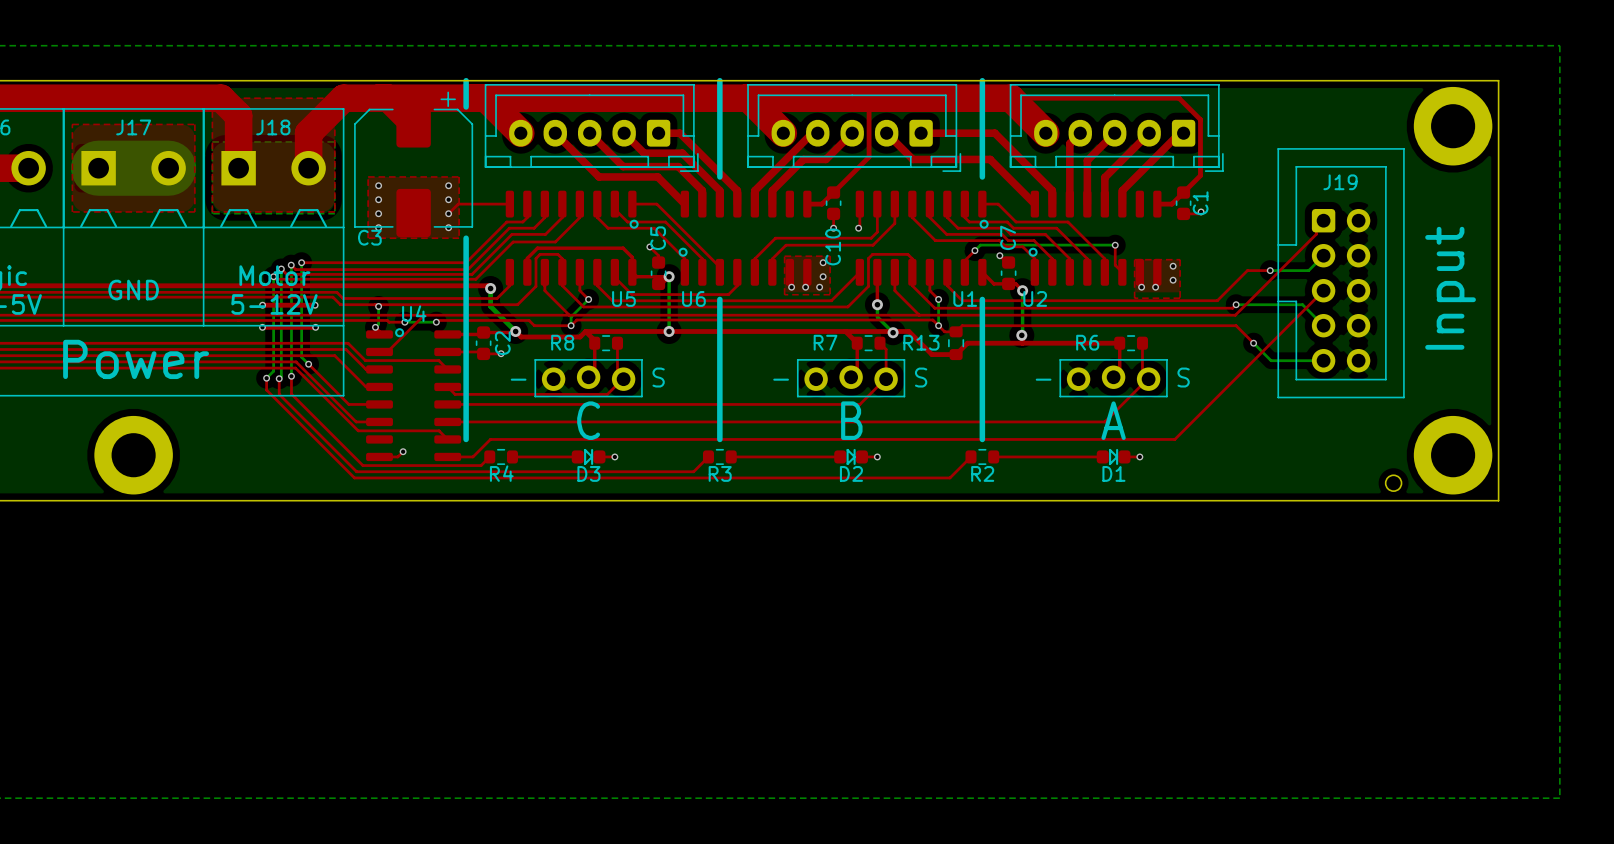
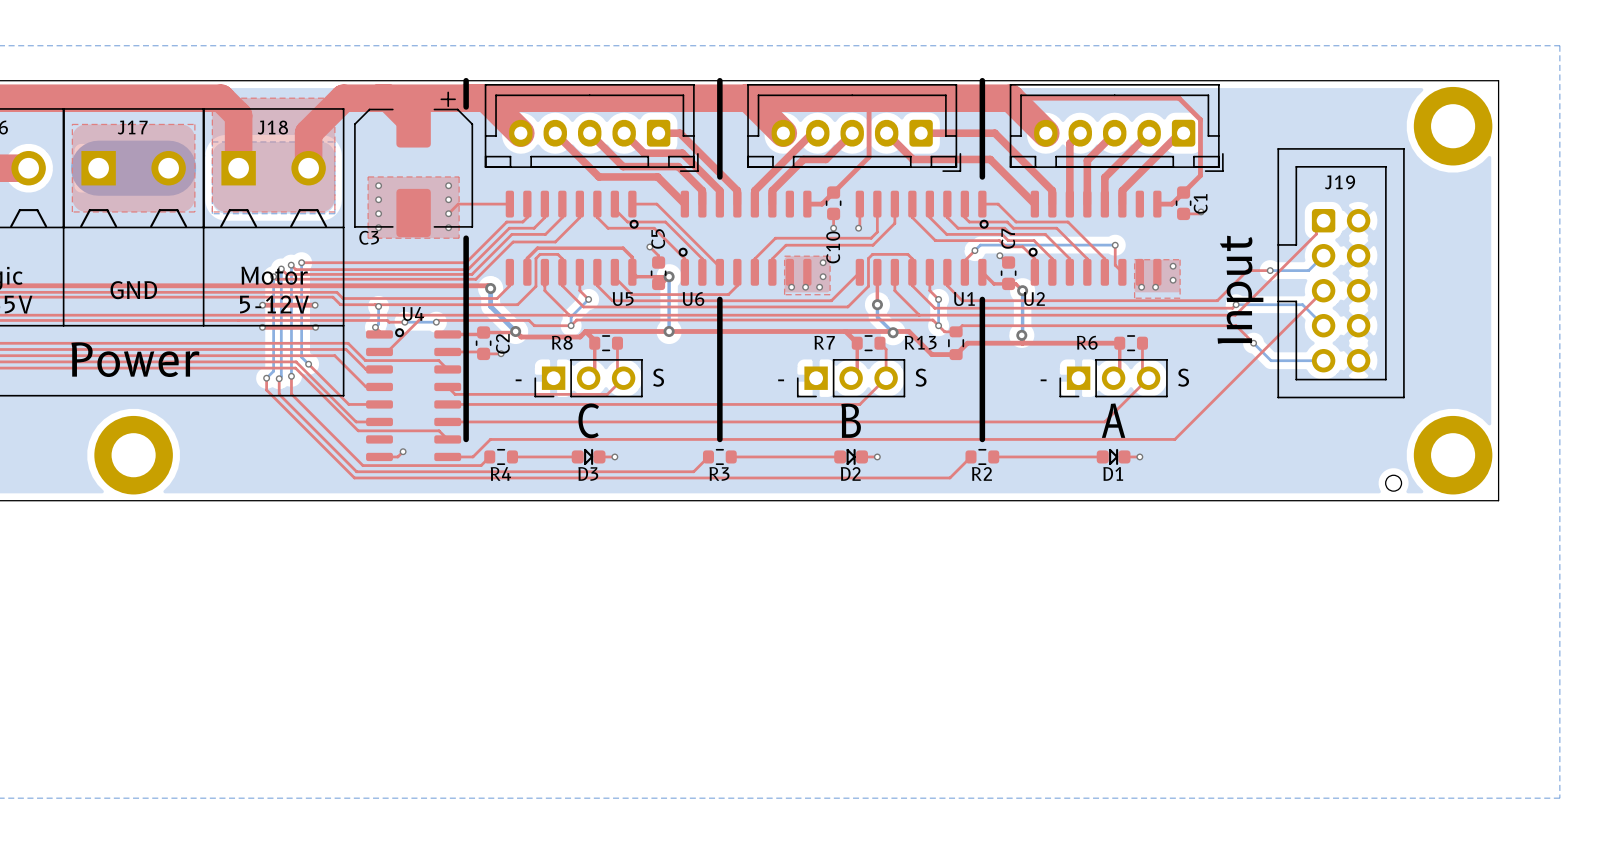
text position: Input (1450, 288) -> Input (1240, 289)
part footprint: [534, 359, 643, 398] -> [534, 359, 643, 398]
part footprint: [796, 359, 906, 398] -> [796, 359, 906, 398]
part footprint: [1059, 359, 1168, 398] -> [1059, 359, 1168, 398]

